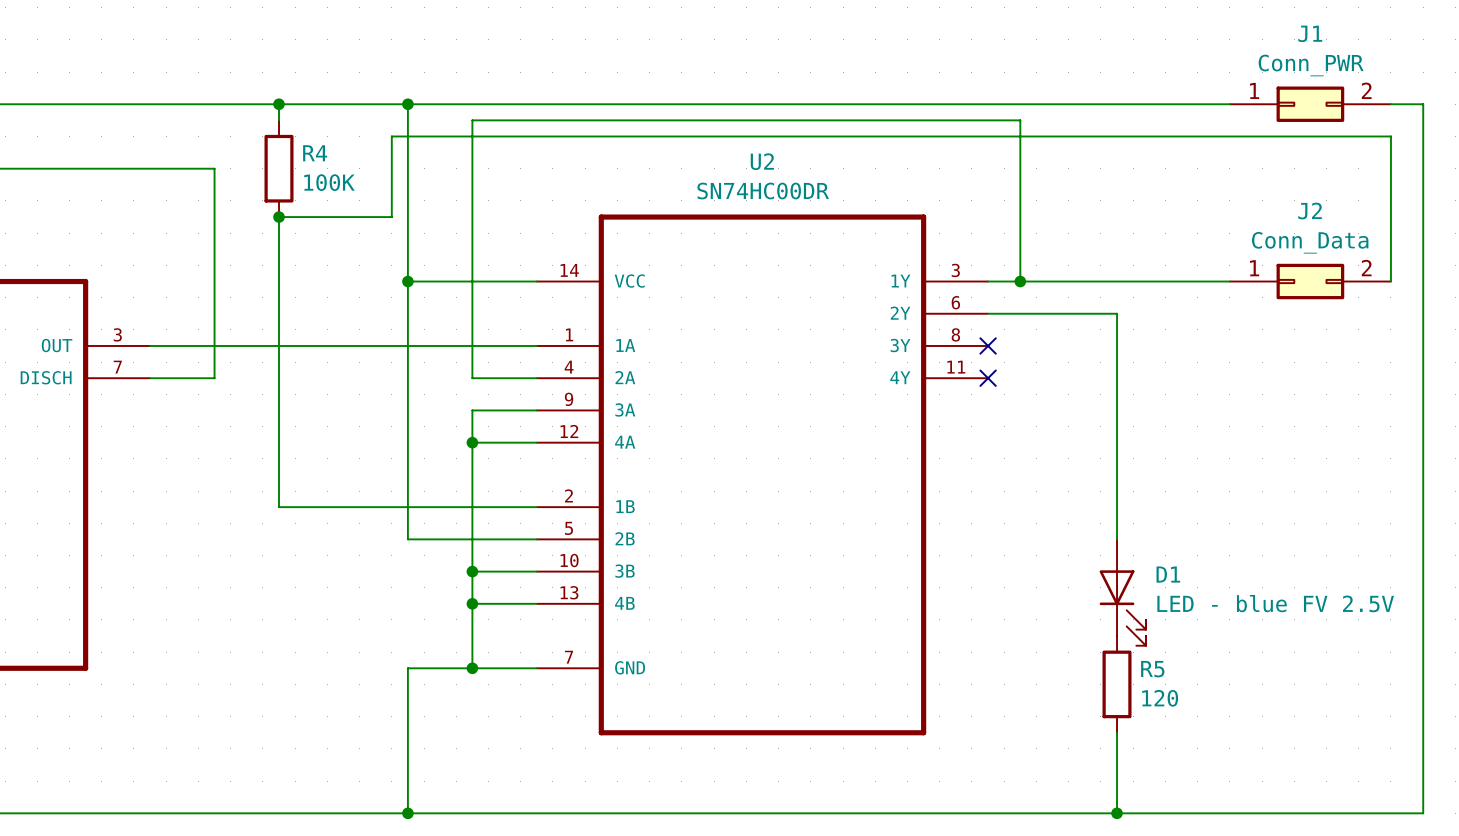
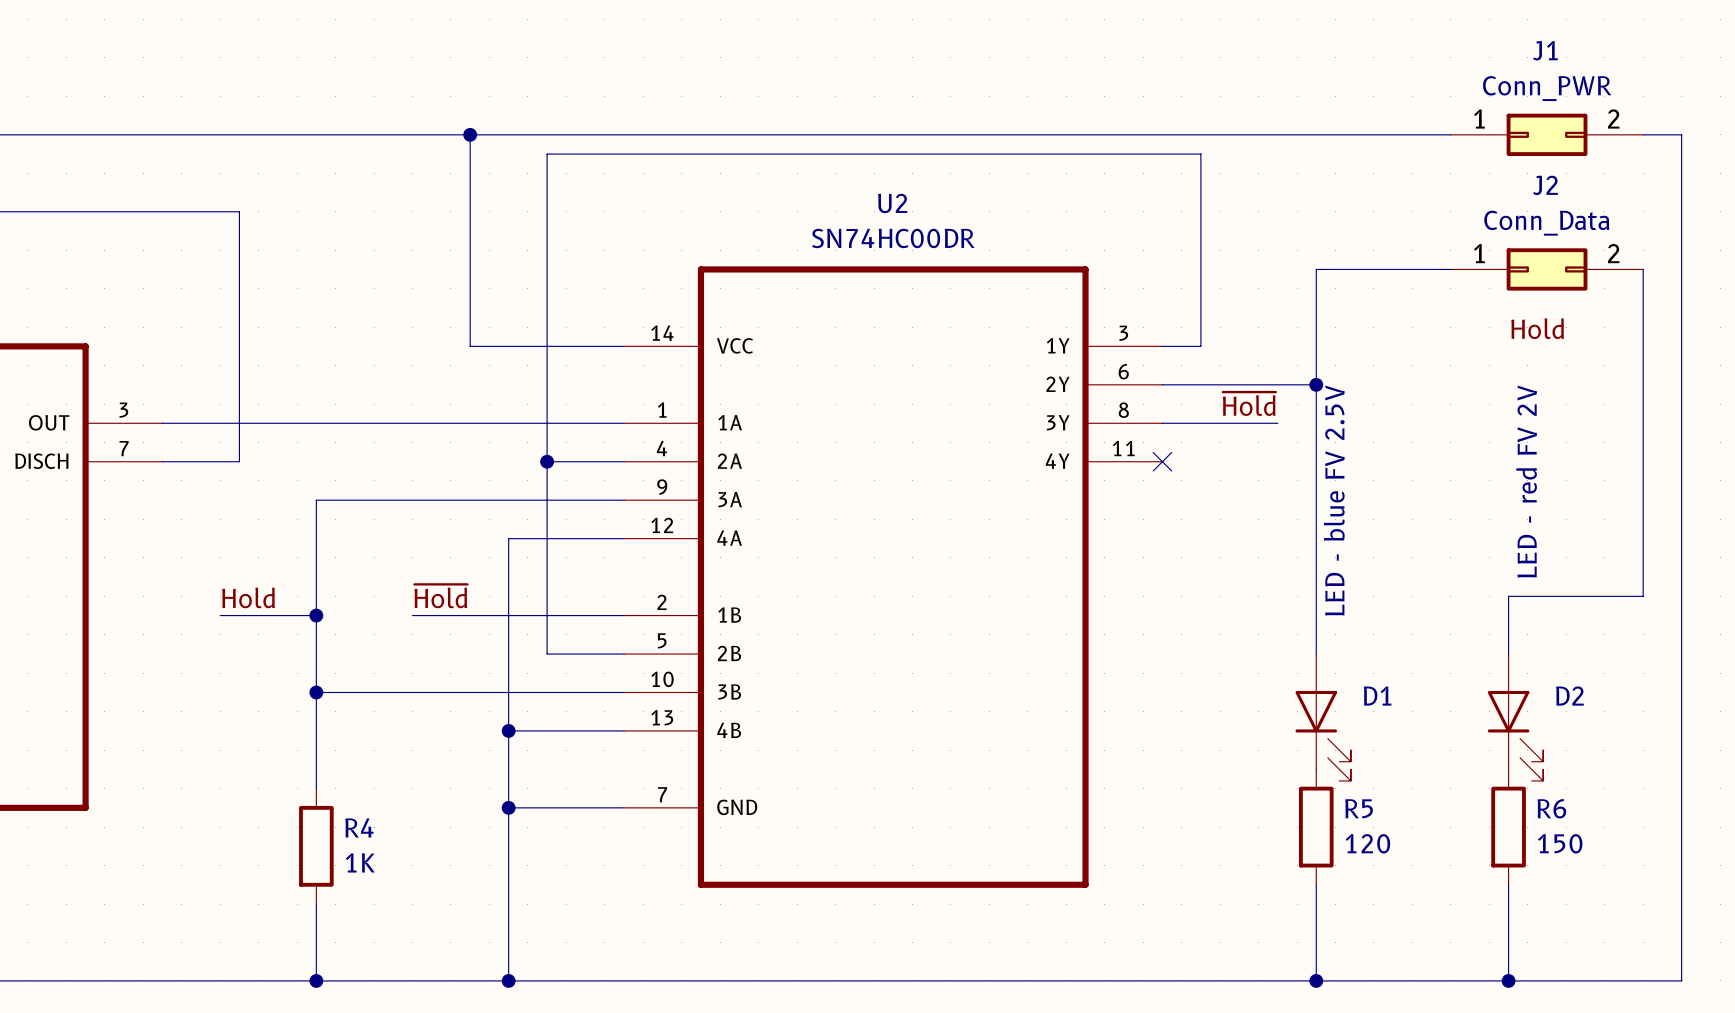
wire: (279, 104) (279, 120) -> none
junction: (279, 104) -> none
R4 position: (279, 168) -> (316, 846)
R4 value: 100K (329, 182) -> 1K (360, 862)
junction: (279, 217) -> none
wire: none -> (1450, 269) (1316, 269) (1316, 384)
wire: (1390, 217) (1390, 136) (391, 136) (391, 217) (279, 217) (279, 410) -> (547, 461) (547, 500) (316, 500)
label: none -> Hold (1537, 328)
wire: (407, 281) (407, 539) (472, 539) (472, 668) -> none
junction: (407, 281) -> none
wire: (1020, 281) (1229, 281) -> none
junction: (1020, 281) -> none
J2 position: (1310, 281) -> (1547, 269)
wire: none -> (1643, 346) (1643, 596) (1508, 596) (1508, 654)
junction: none -> (1316, 384)
label: none -> ~{Hold} (1249, 404)
wire: none -> (1162, 423) (1277, 423)
no-connect mark: (988, 345) -> none
junction: none -> (547, 461)
wire: none -> (547, 538) (508, 538) (508, 980)
junction: (472, 442) -> none
label: none -> ~{Hold} (440, 596)
label: none -> Hold (248, 597)
wire: none -> (220, 615) (316, 615) (316, 788)
wire: (279, 507) (359, 507) -> none
junction: none -> (316, 615)
wire: none -> (316, 692) (547, 692)
junction: none -> (316, 692)
junction: (472, 571) -> none
D2: none -> LED - red FV 2V (1515, 717)
wire: none -> (508, 730) (547, 730)
junction: none -> (508, 730)
junction: (472, 603) -> none
D1 value rotation: 0° (1275, 603) -> 90° counterclockwise (1334, 500)
wire: (440, 668) (407, 668) (407, 813) -> none
junction position: (472, 668) -> (508, 807)
R6: none -> 150 (1508, 827)
wire: none -> (1508, 884) (1508, 980)
wire: none -> (316, 904) (316, 980)
junction: none -> (316, 980)
junction position: (407, 813) -> (508, 980)
junction: none -> (1508, 980)

